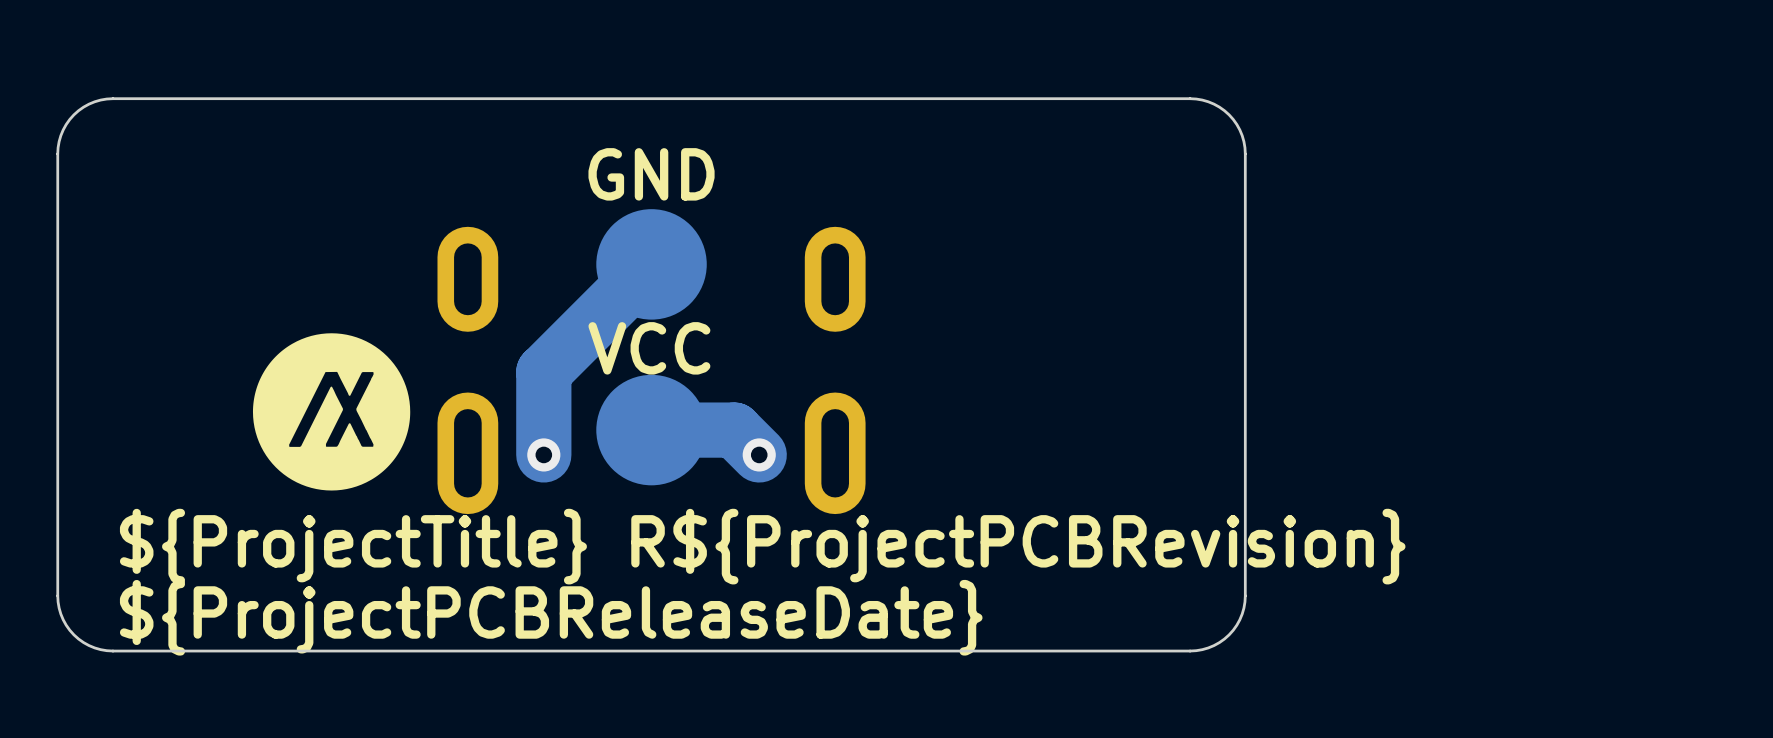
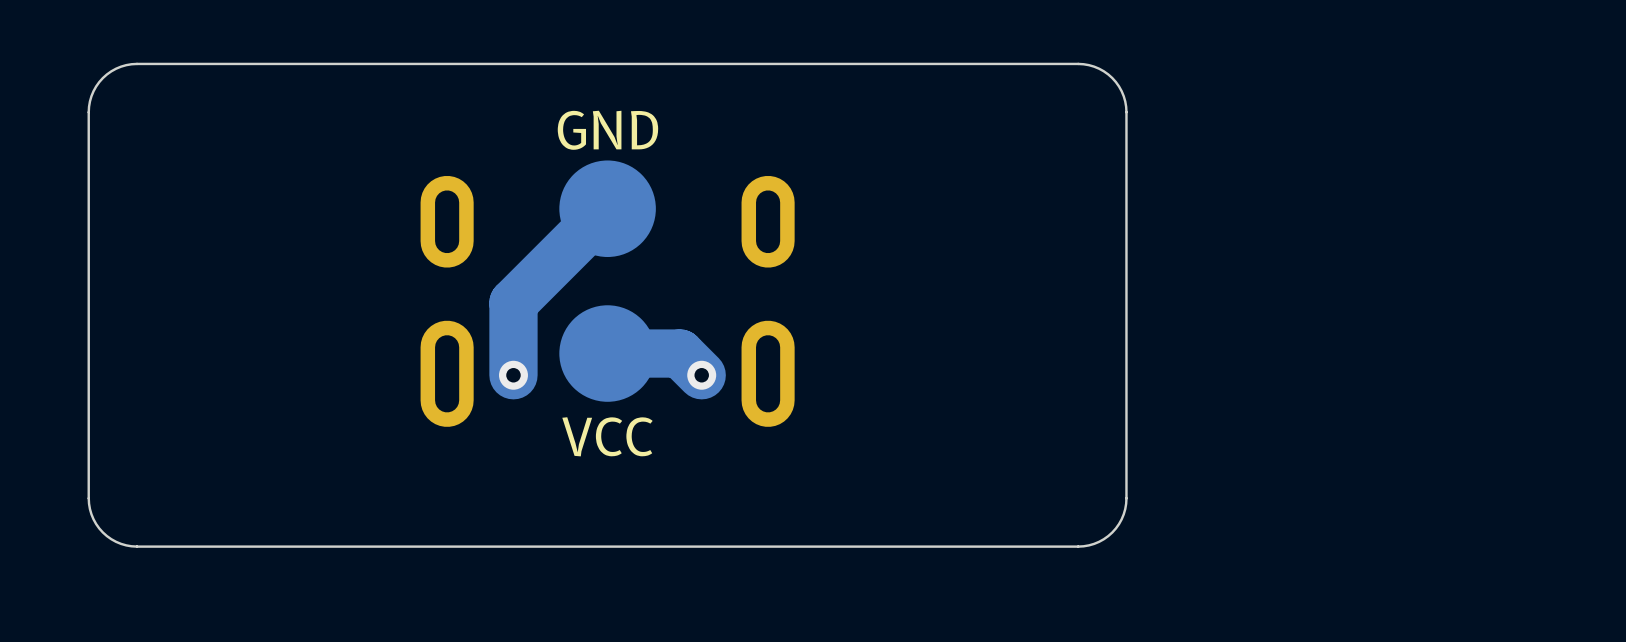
drawing: [252, 333, 411, 491] -> none
text position: VCC (649, 348) -> VCC (607, 436)
text: ${ProjectTitle} R${ProjectPCBRevision} (762, 546) -> none
text: ${ProjectPCBReleaseDate} (551, 617) -> none

